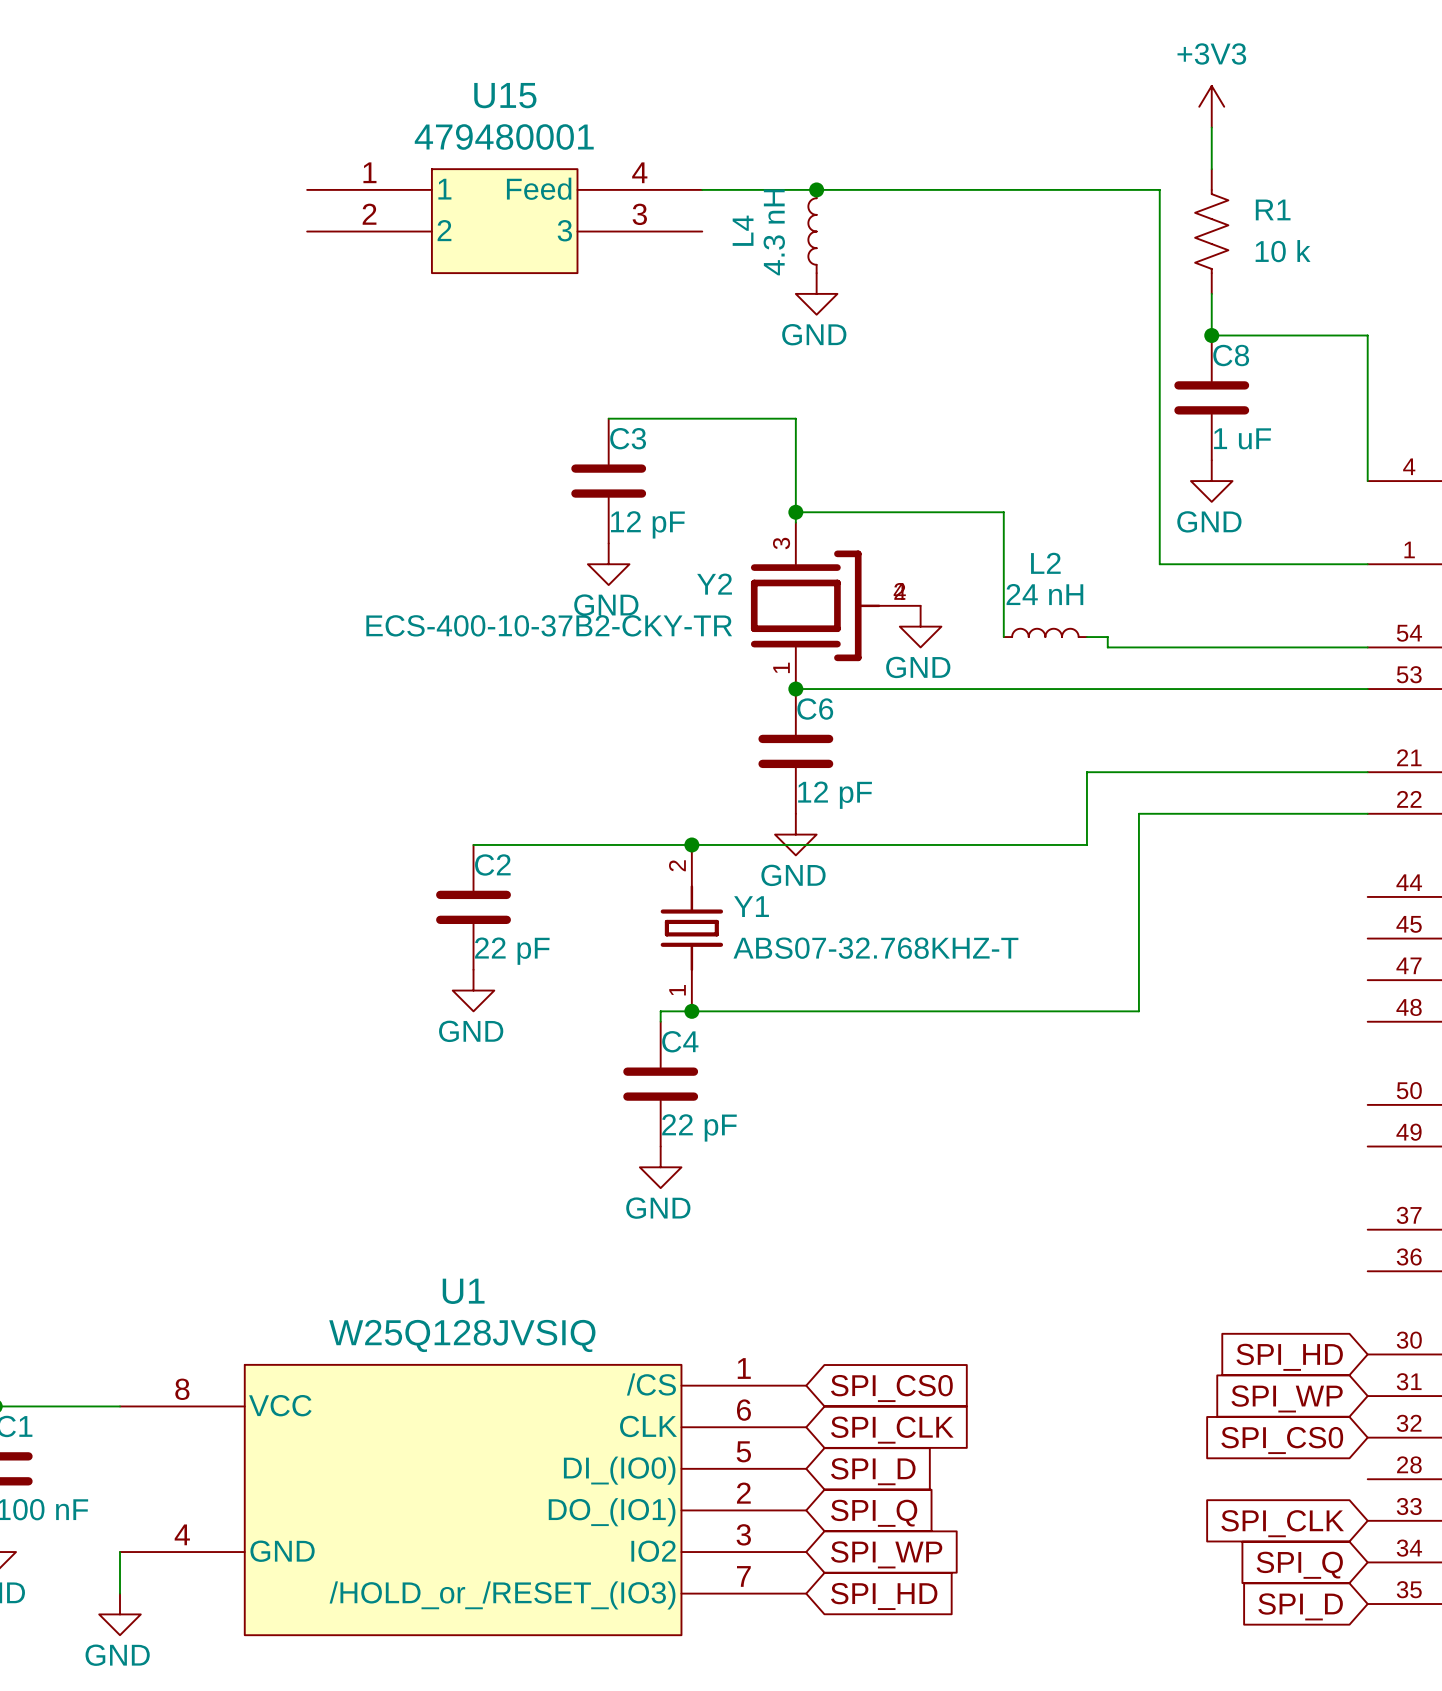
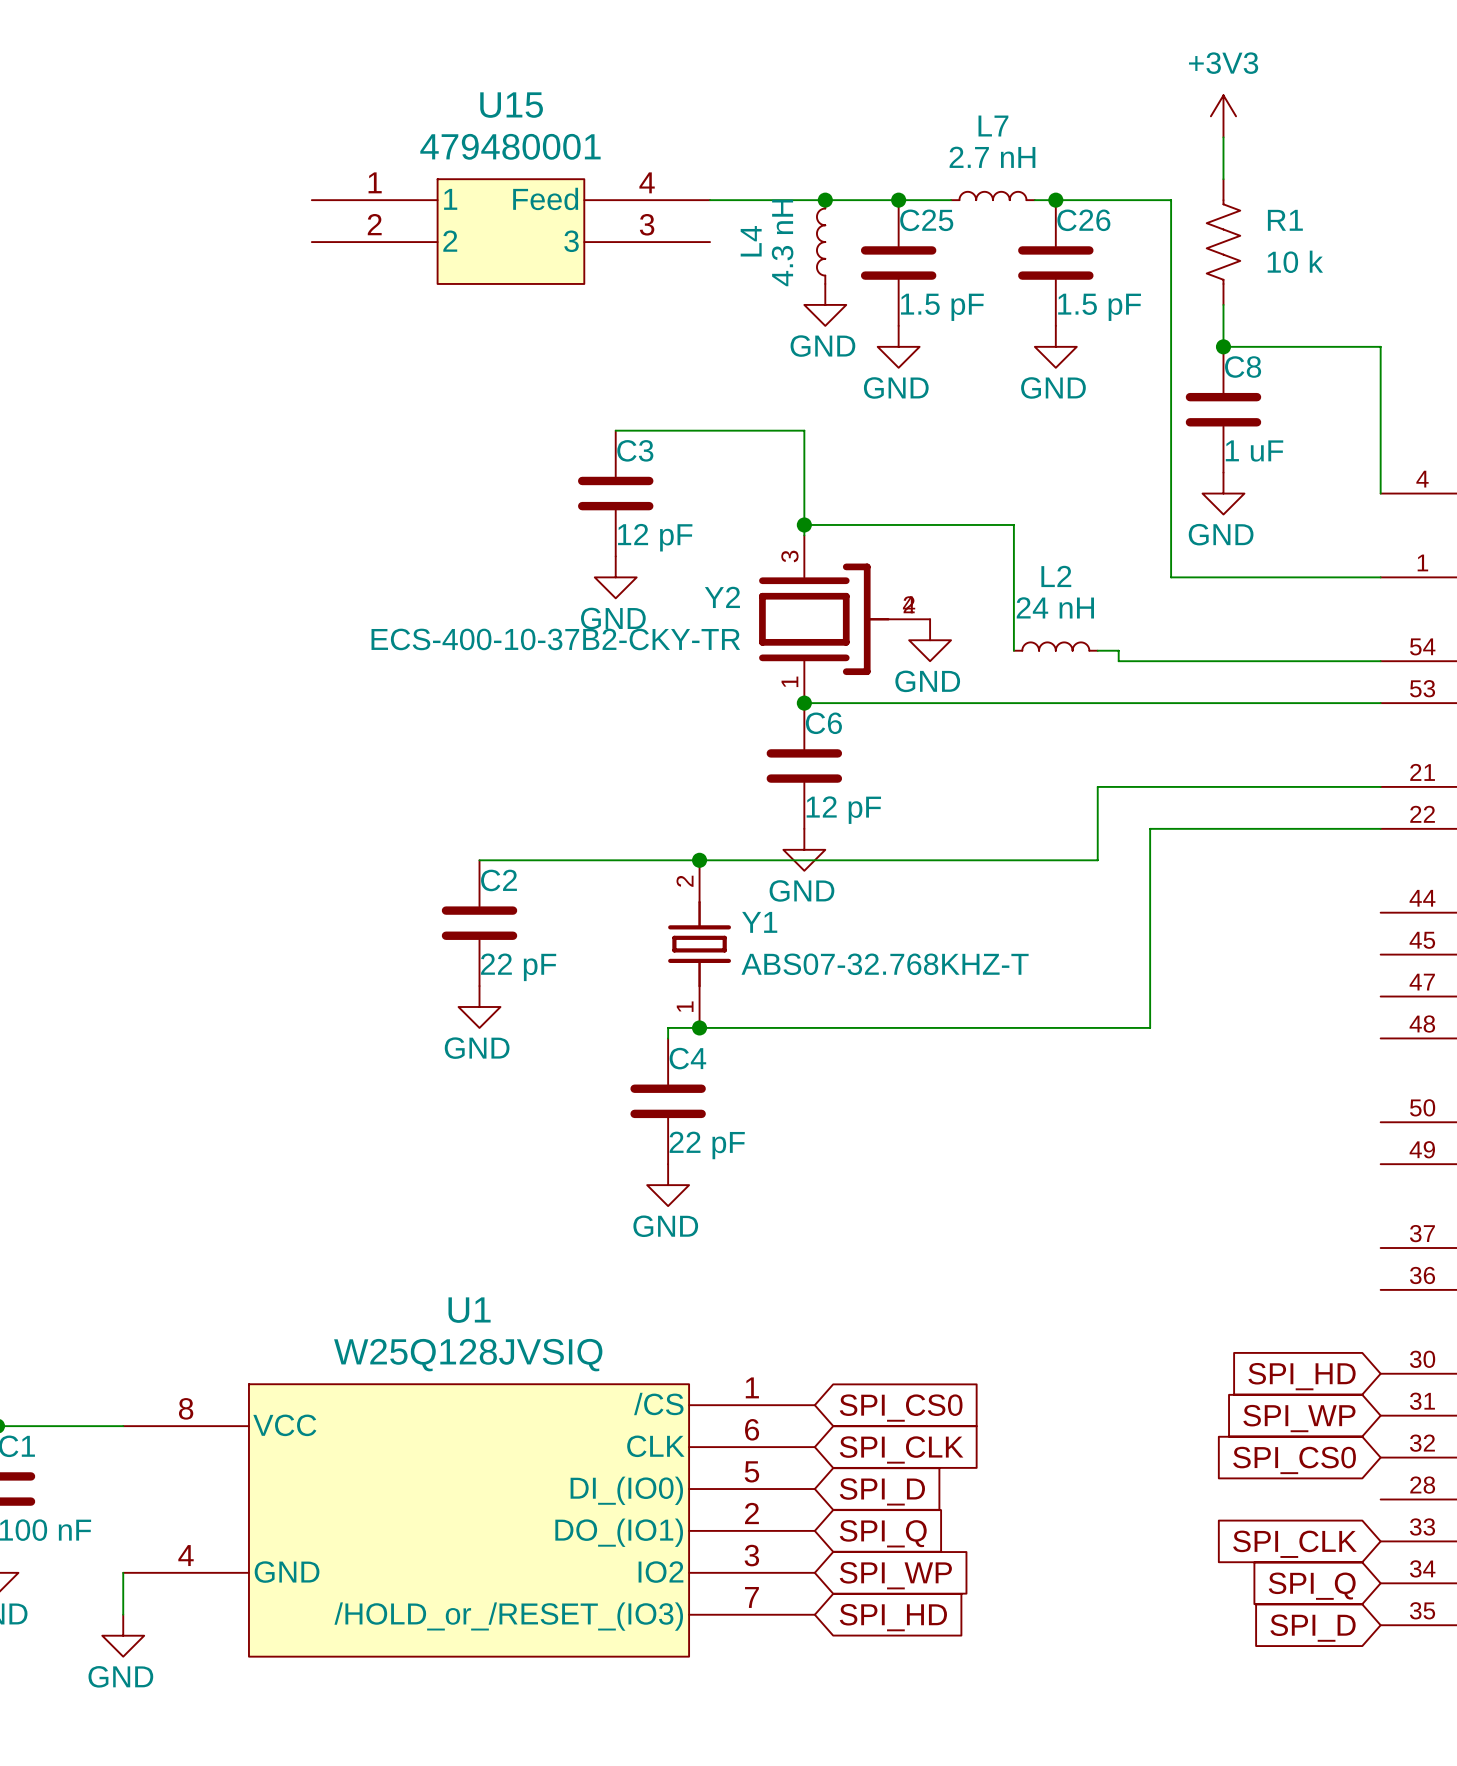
L7: none -> 2.7 nH (992, 195)
junction: none -> (898, 200)
wire: (941, 189) (1024, 189) -> none
junction: none -> (1055, 200)
C25: none -> 1.5 pF (898, 263)
C26: none -> 1.5 pF (1055, 263)
power symbol: none -> GND (898, 346)
power symbol: none -> GND (1055, 346)

